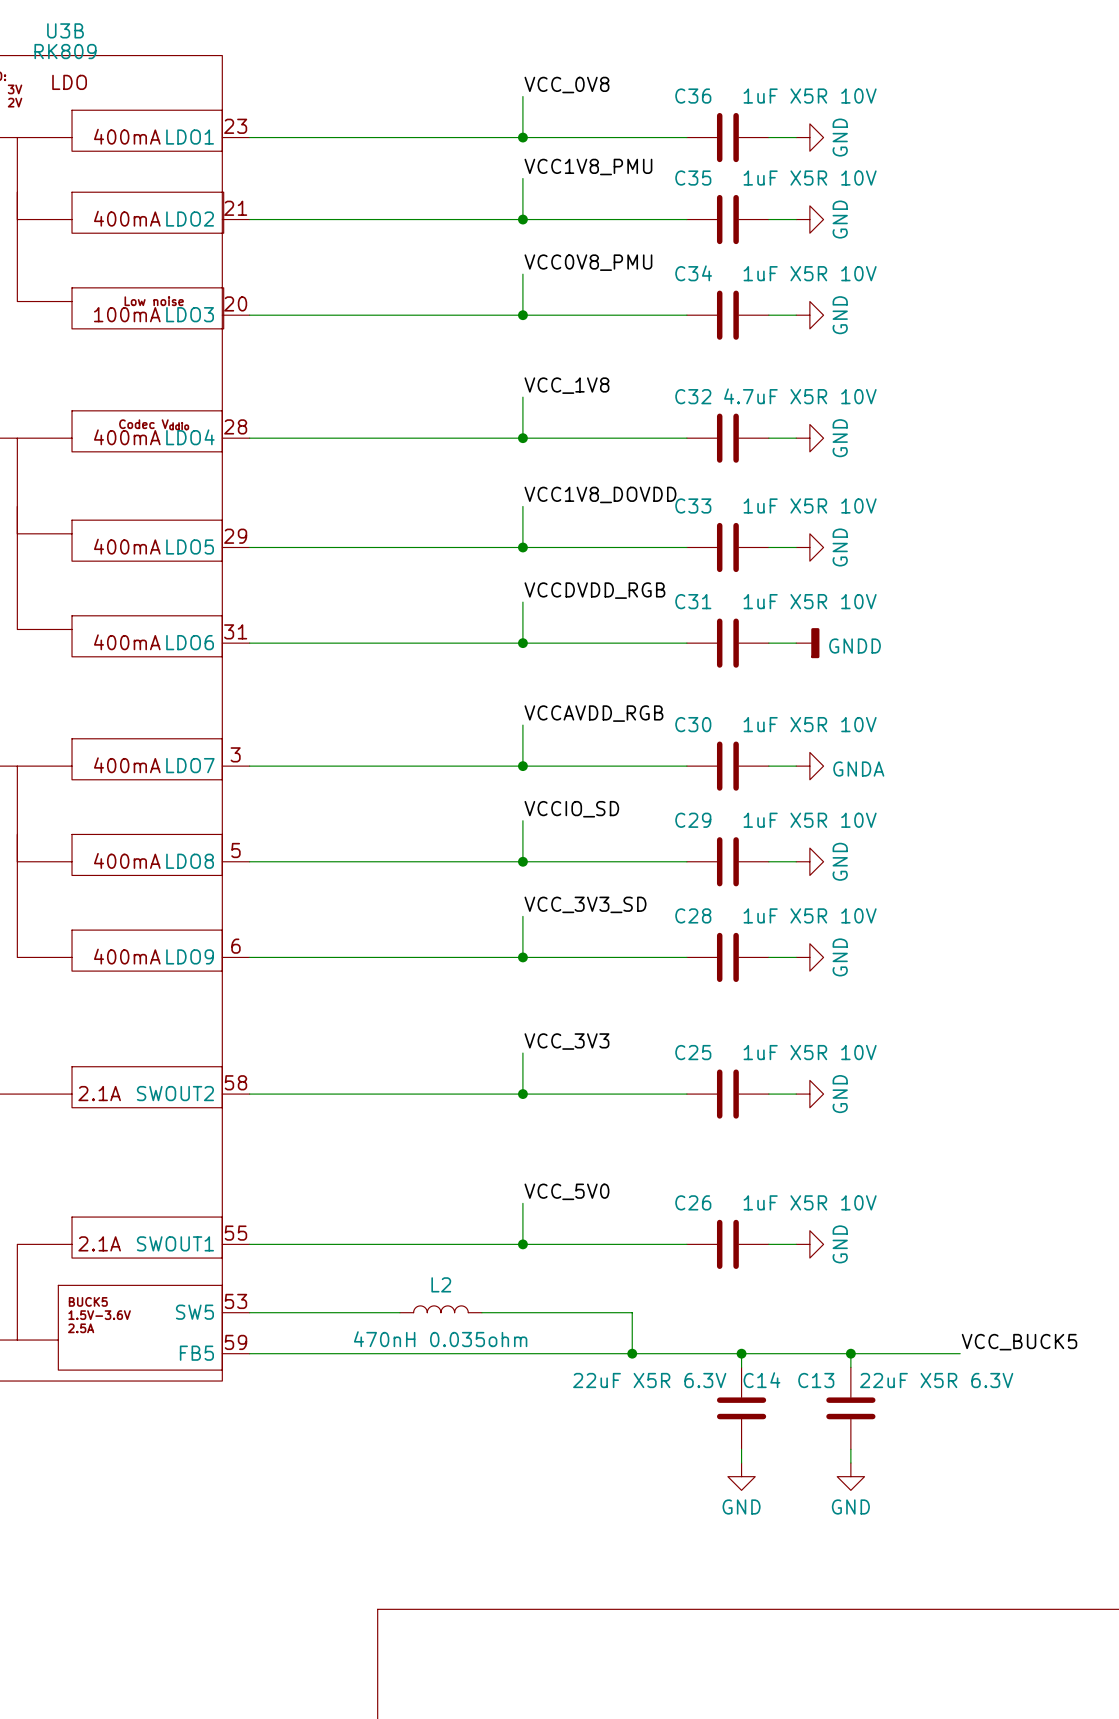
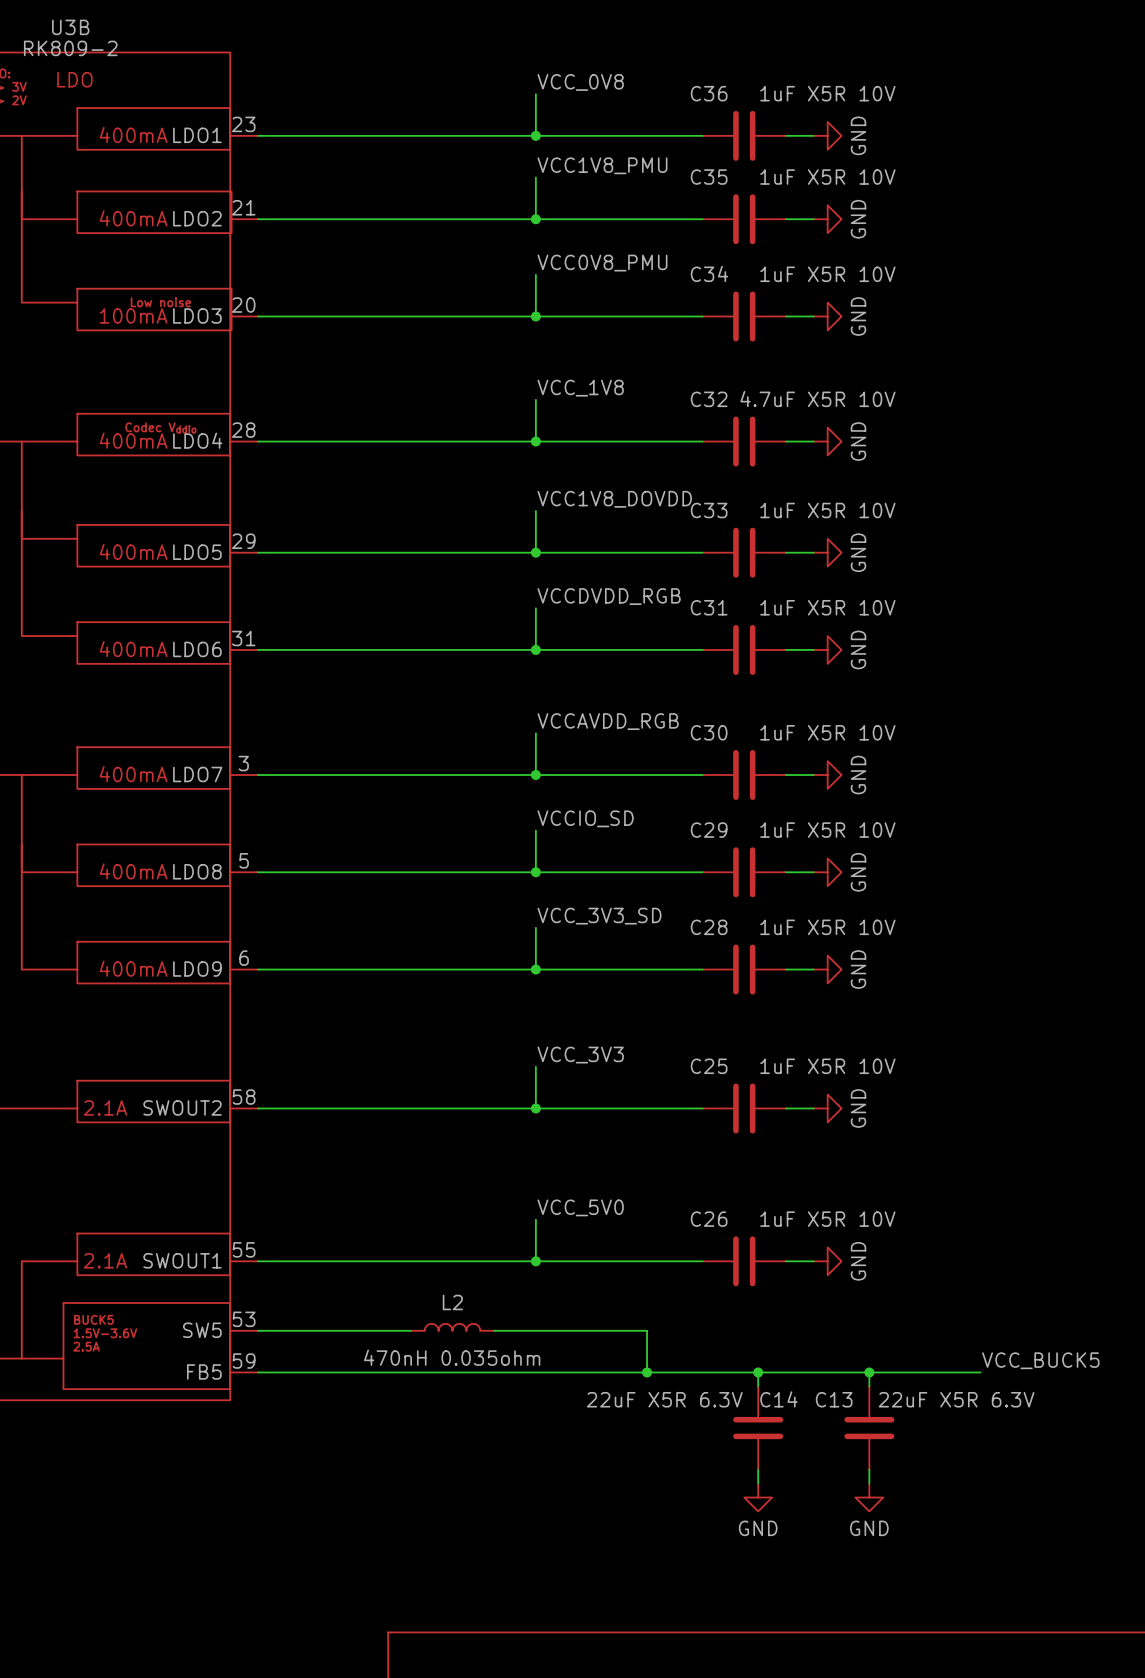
U3B value: RK809 (65, 51) -> RK809-2 (70, 48)
power symbol: GNDD (807, 643) -> GND (827, 649)
power symbol: GNDA (809, 766) -> GND (827, 775)

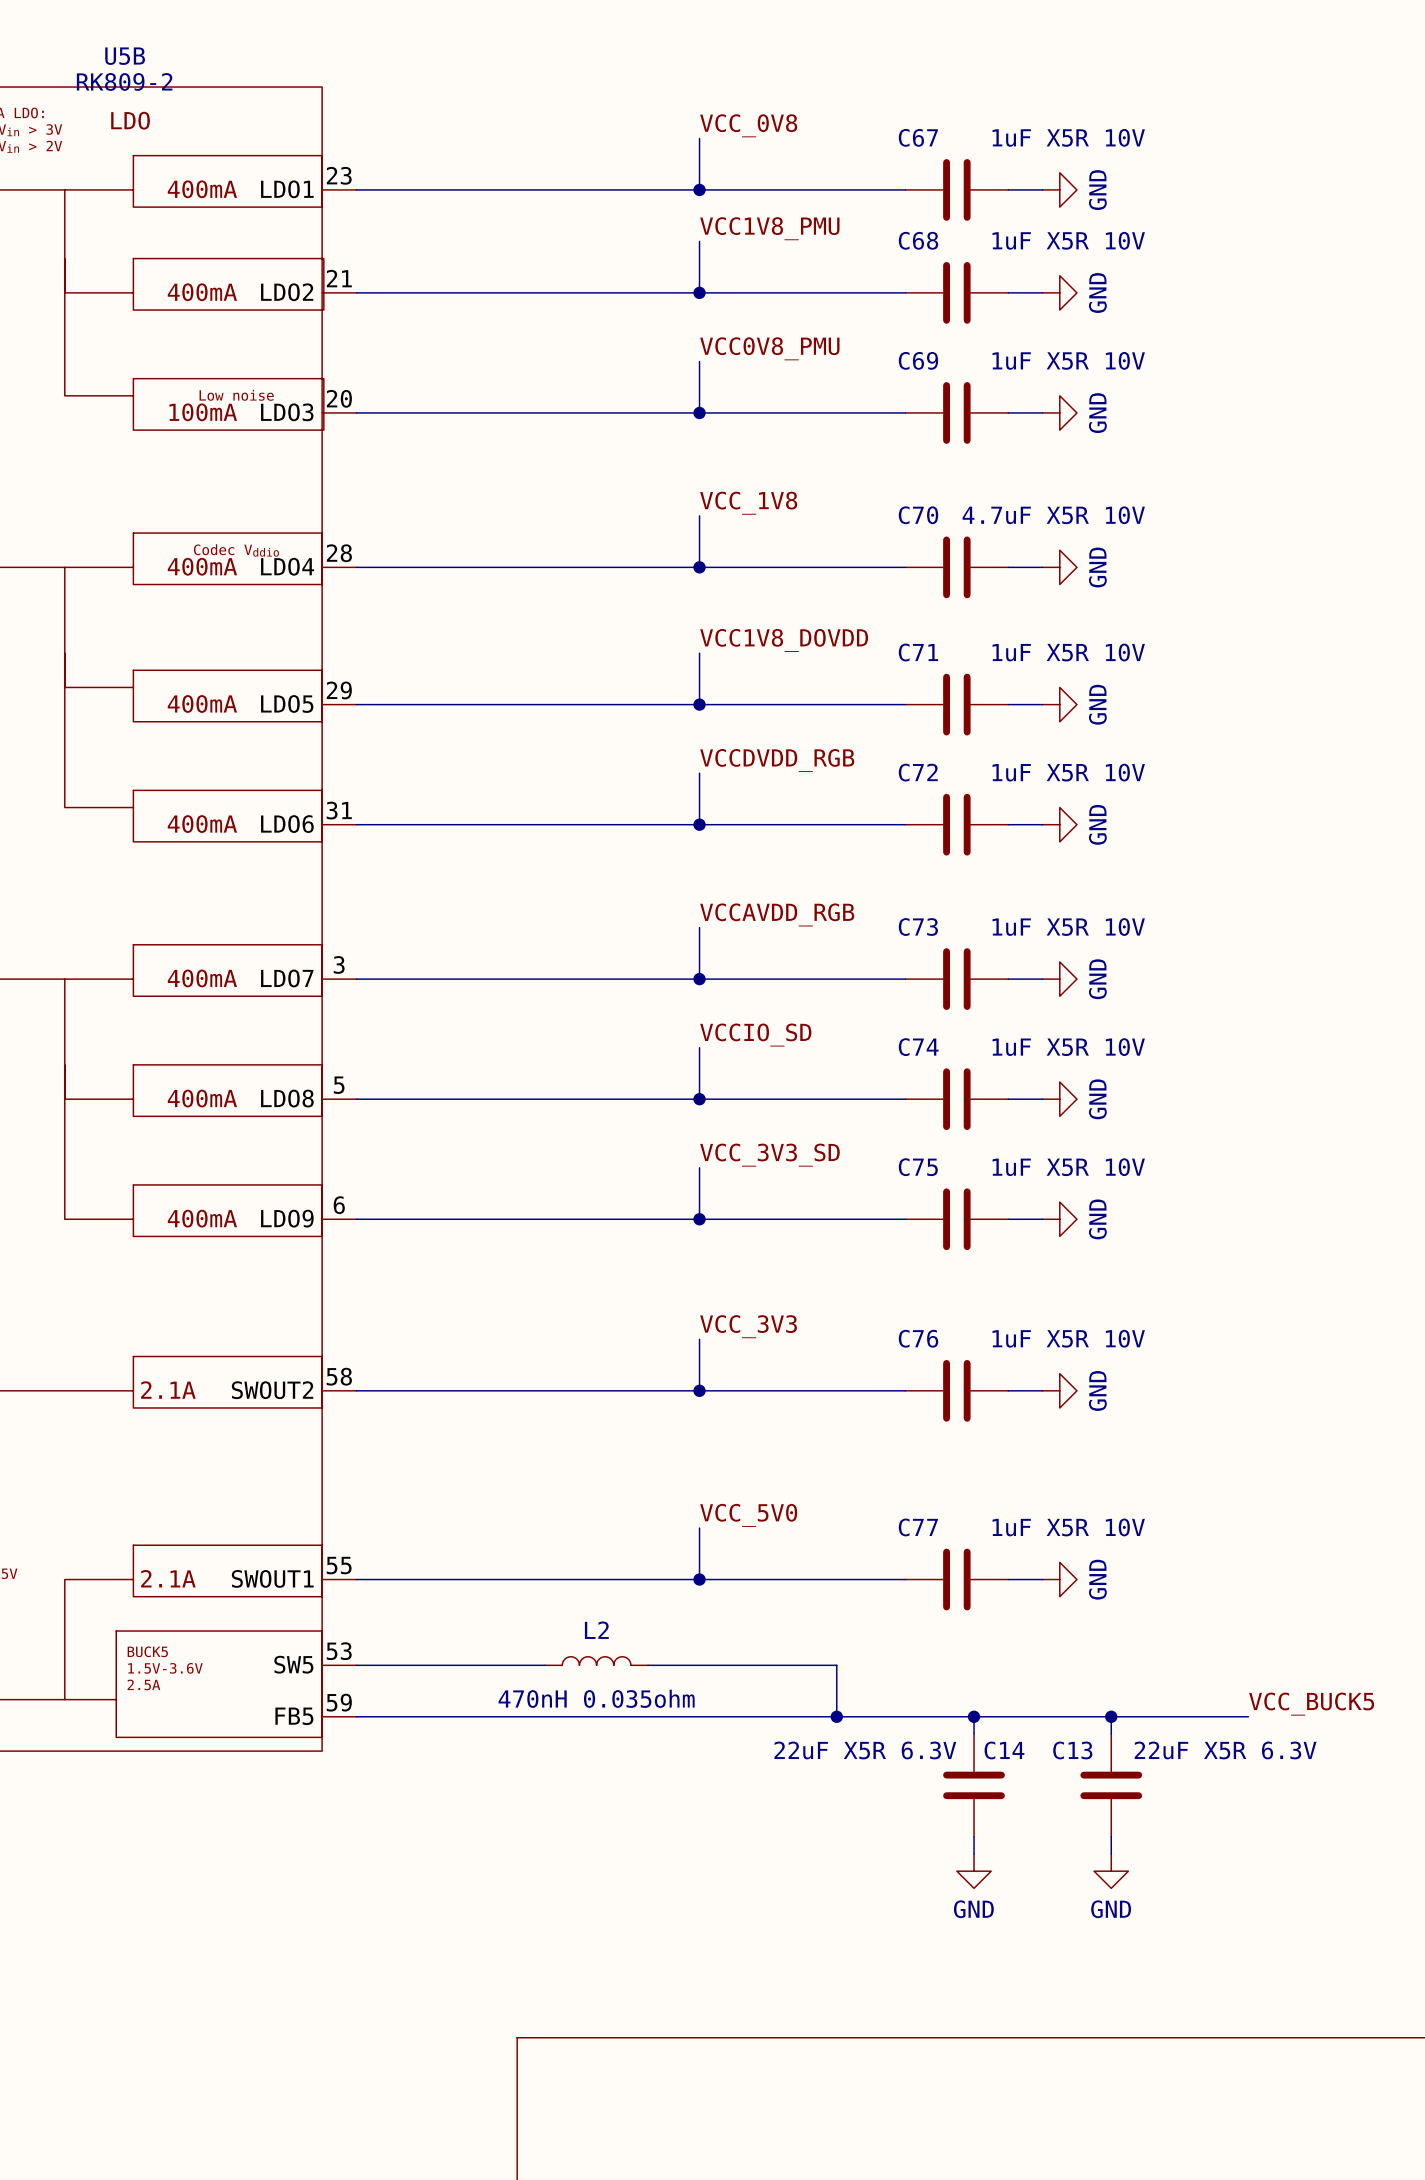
U3B name: U3B (70, 27) -> U5B (125, 56)
C36 name: C36 (709, 93) -> C67 (918, 137)
C35 name: C35 (709, 177) -> C68 (918, 240)
C34 name: C34 (709, 273) -> C69 (918, 360)
C32 name: C32 (709, 399) -> C70 (918, 515)
C33 name: C33 (709, 510) -> C71 (918, 652)
C31 name: C31 (709, 607) -> C72 (918, 772)
C30 name: C30 (709, 732) -> C73 (918, 927)
C29 name: C29 (709, 830) -> C74 (918, 1047)
C28 name: C28 (709, 927) -> C75 (918, 1167)
C25 name: C25 (709, 1066) -> C76 (918, 1338)
C26 name: C26 (709, 1219) -> C77 (918, 1527)

